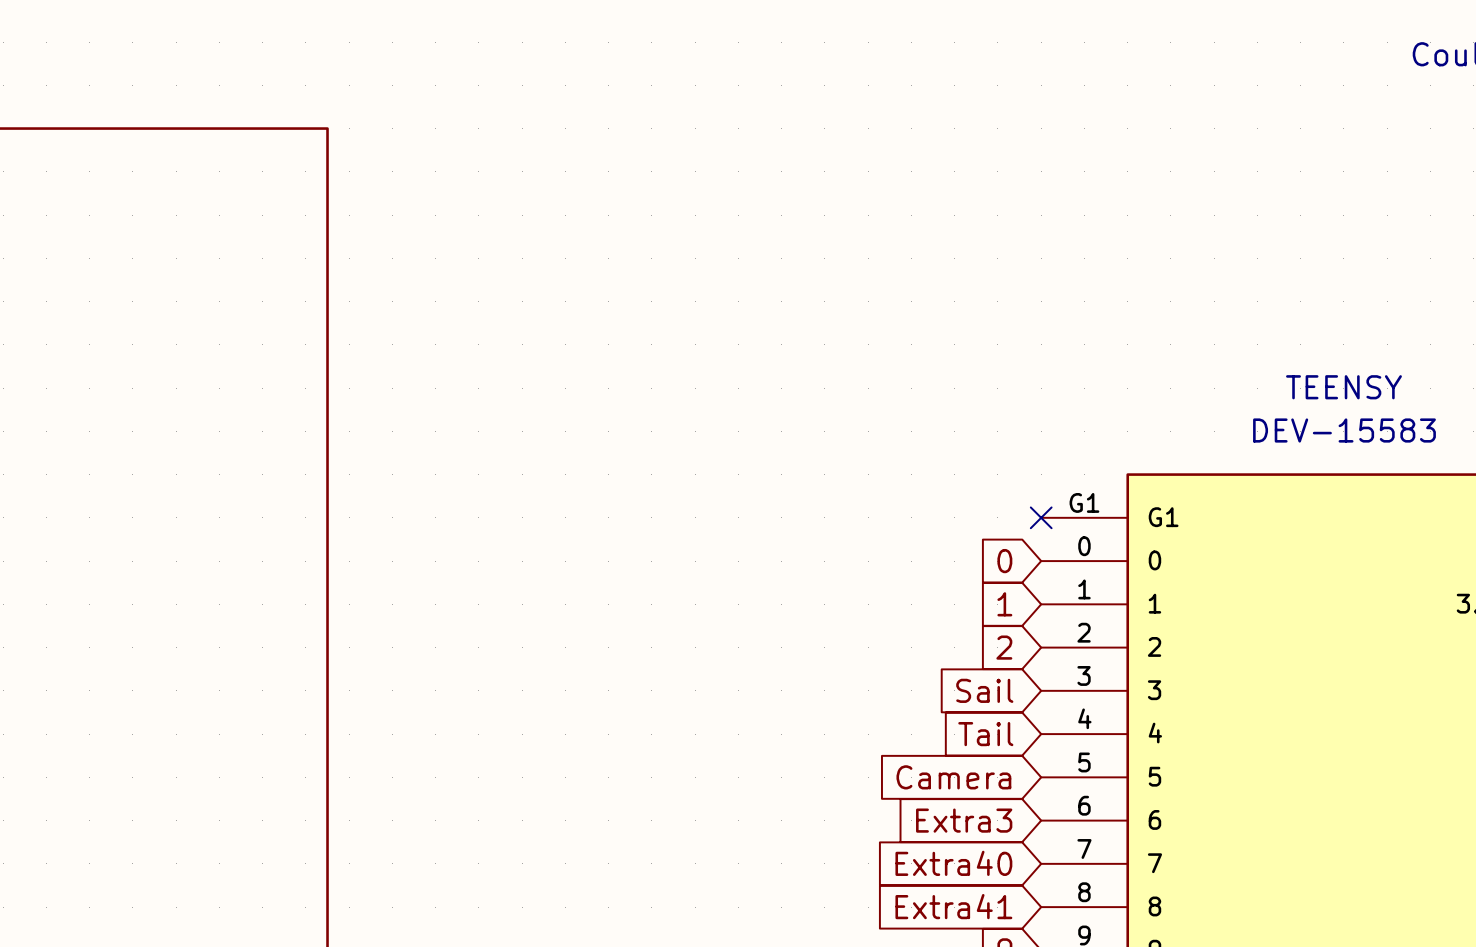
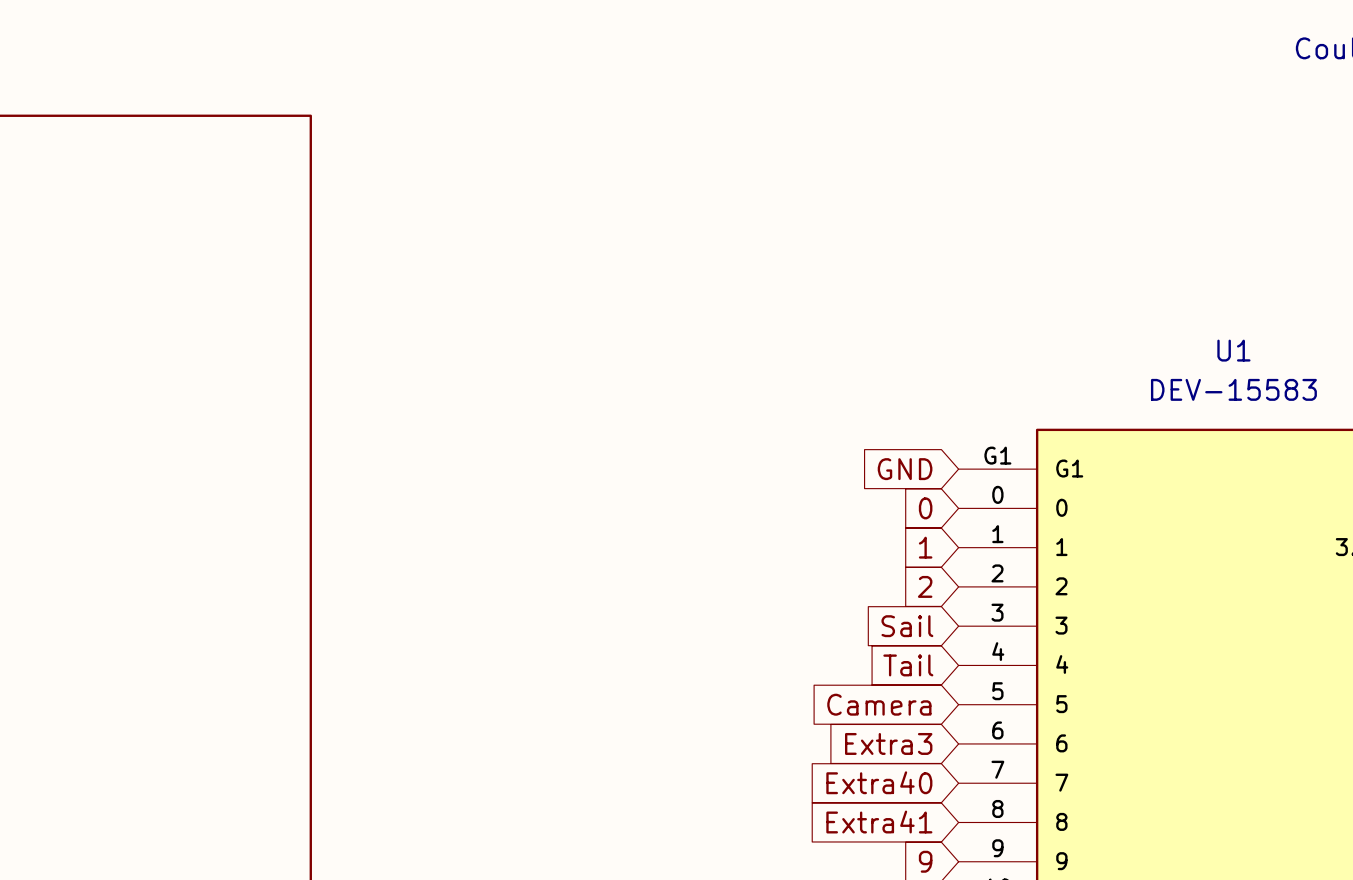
TEENSY name: TEENSY (1343, 387) -> U1 (1233, 350)
global label: none -> GND (905, 469)
no-connect mark: (1041, 517) -> none

